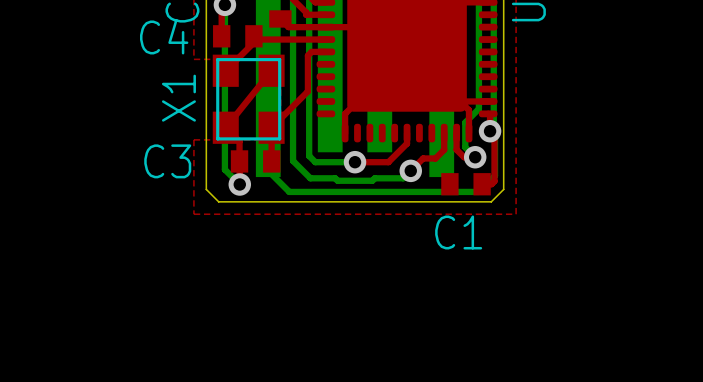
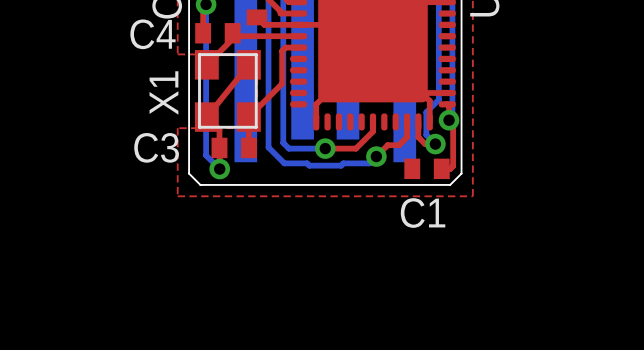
bottom track: (268, 65) (268, 170) (289, 191) (478, 191) (495, 175) (495, 137) (491, 133) -> none

